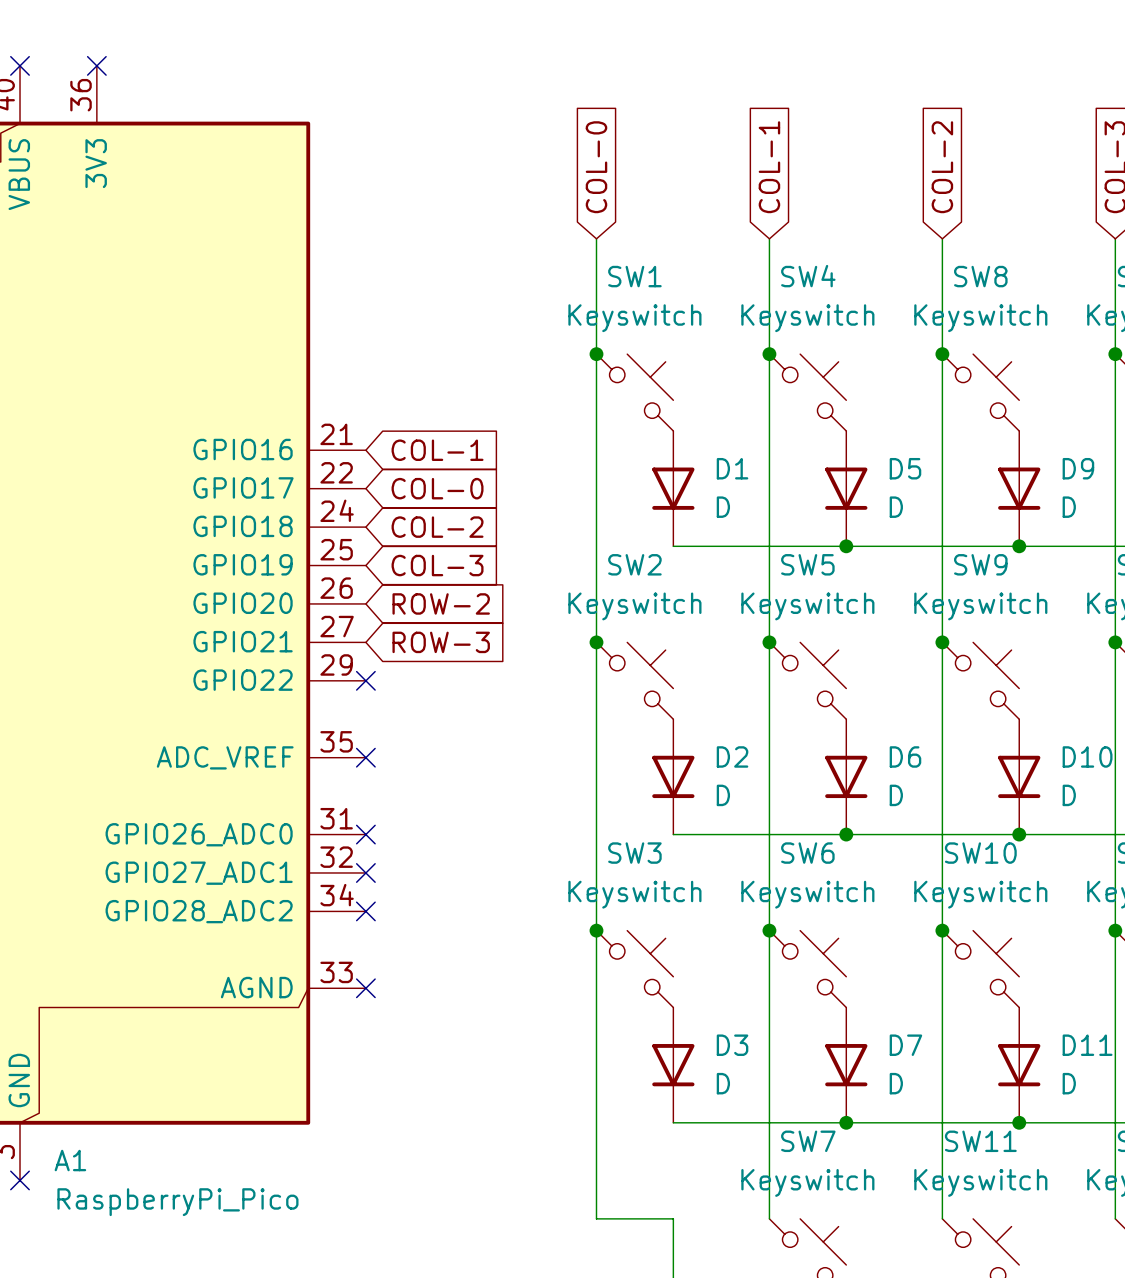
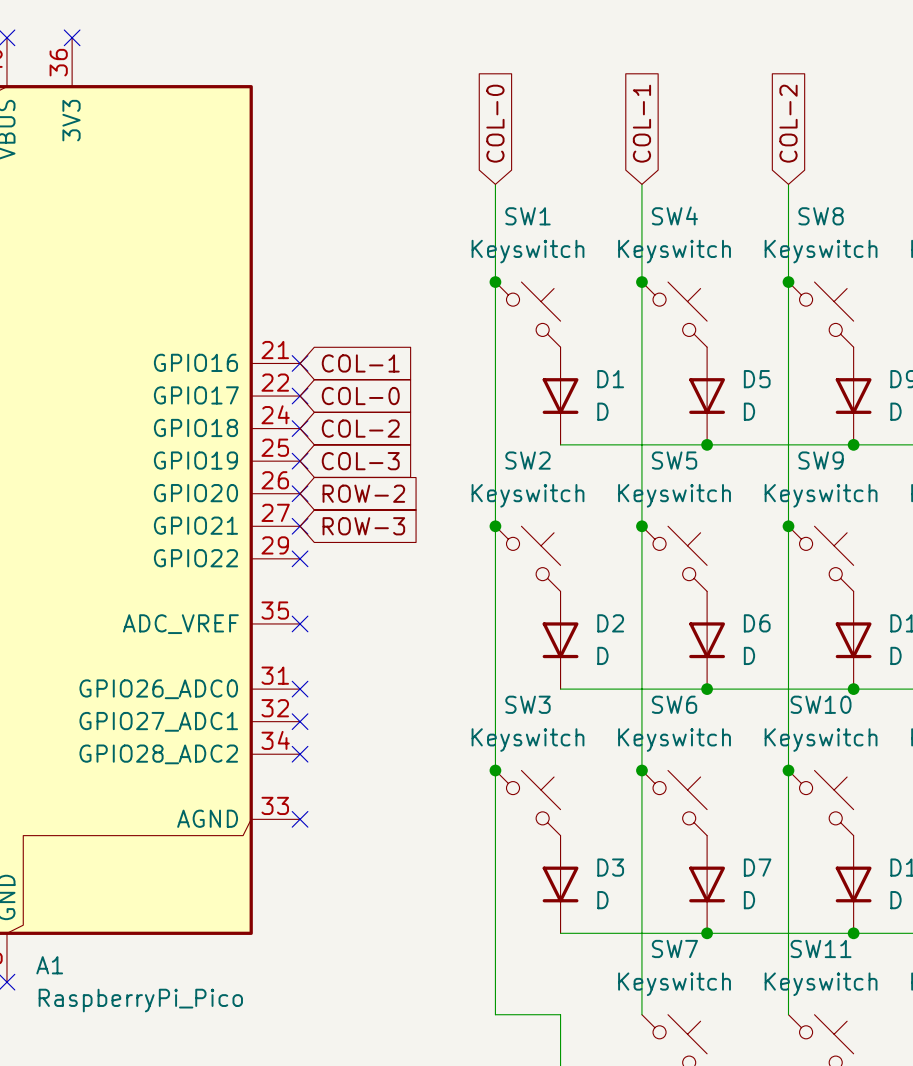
no-connect mark: none -> (300, 363)
no-connect mark: none -> (300, 396)
no-connect mark: none -> (300, 428)
no-connect mark: none -> (300, 461)
no-connect mark: none -> (300, 493)
no-connect mark: none -> (300, 526)

